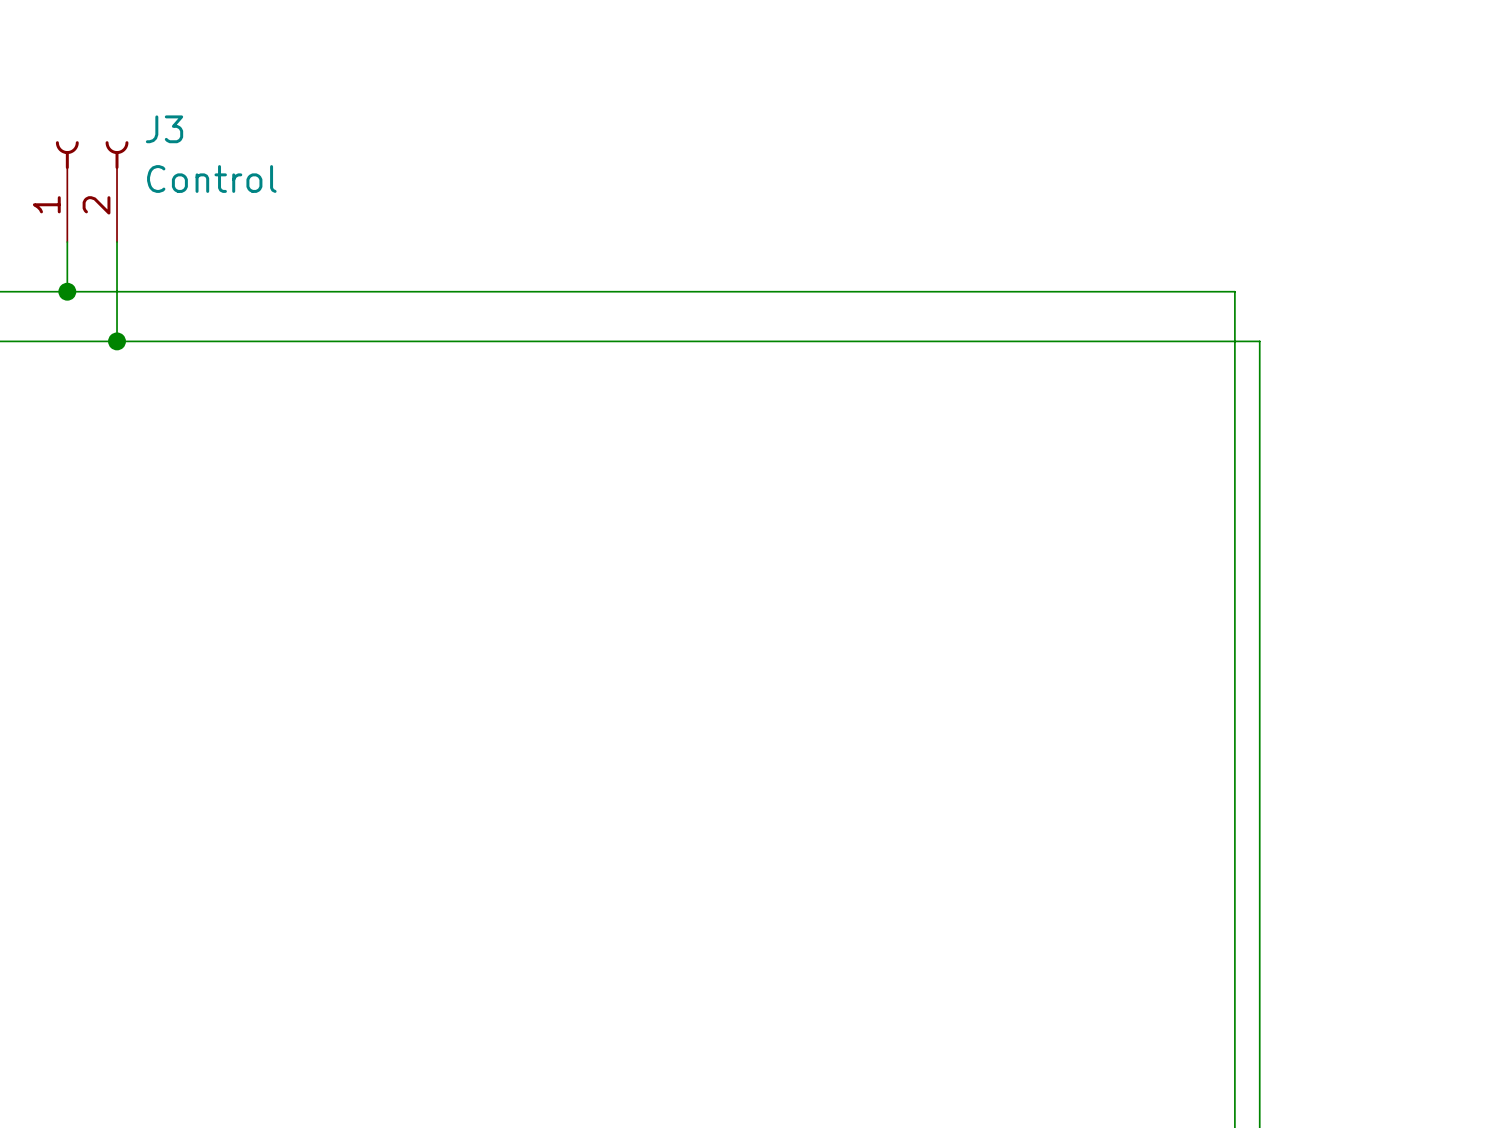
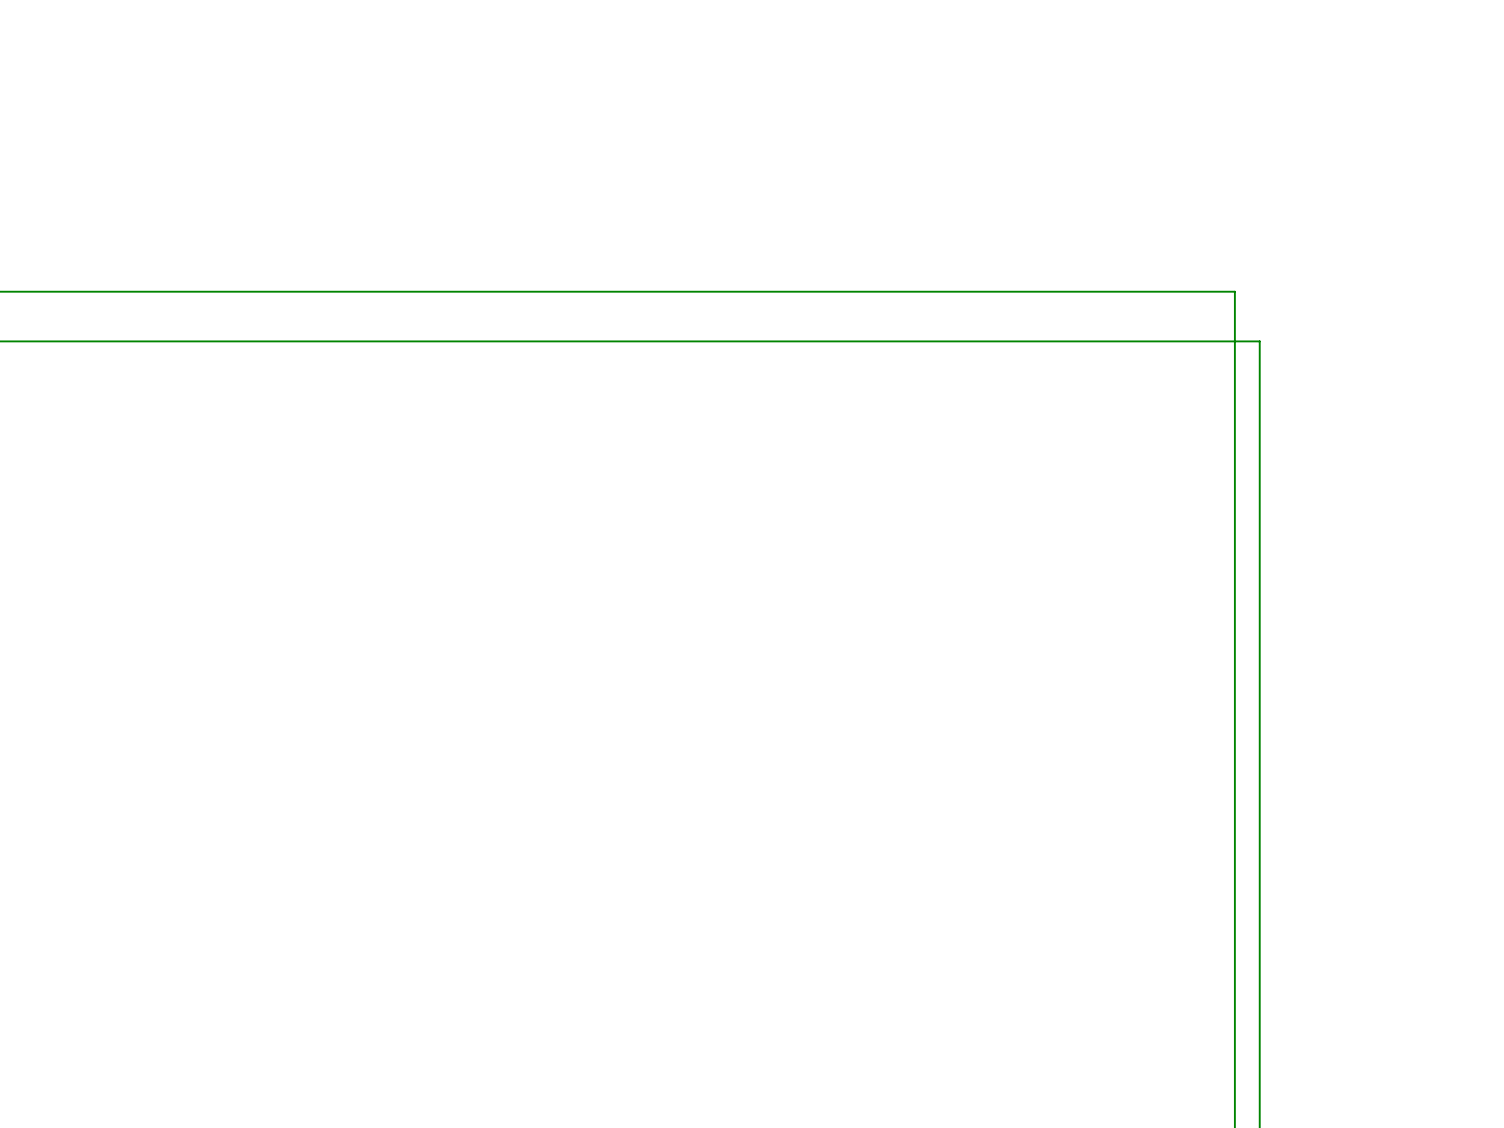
J3: Control (92, 191) -> none
wire: (67, 242) (67, 291) -> none
wire: (117, 242) (117, 341) -> none
junction: (67, 291) -> none
junction: (117, 341) -> none

